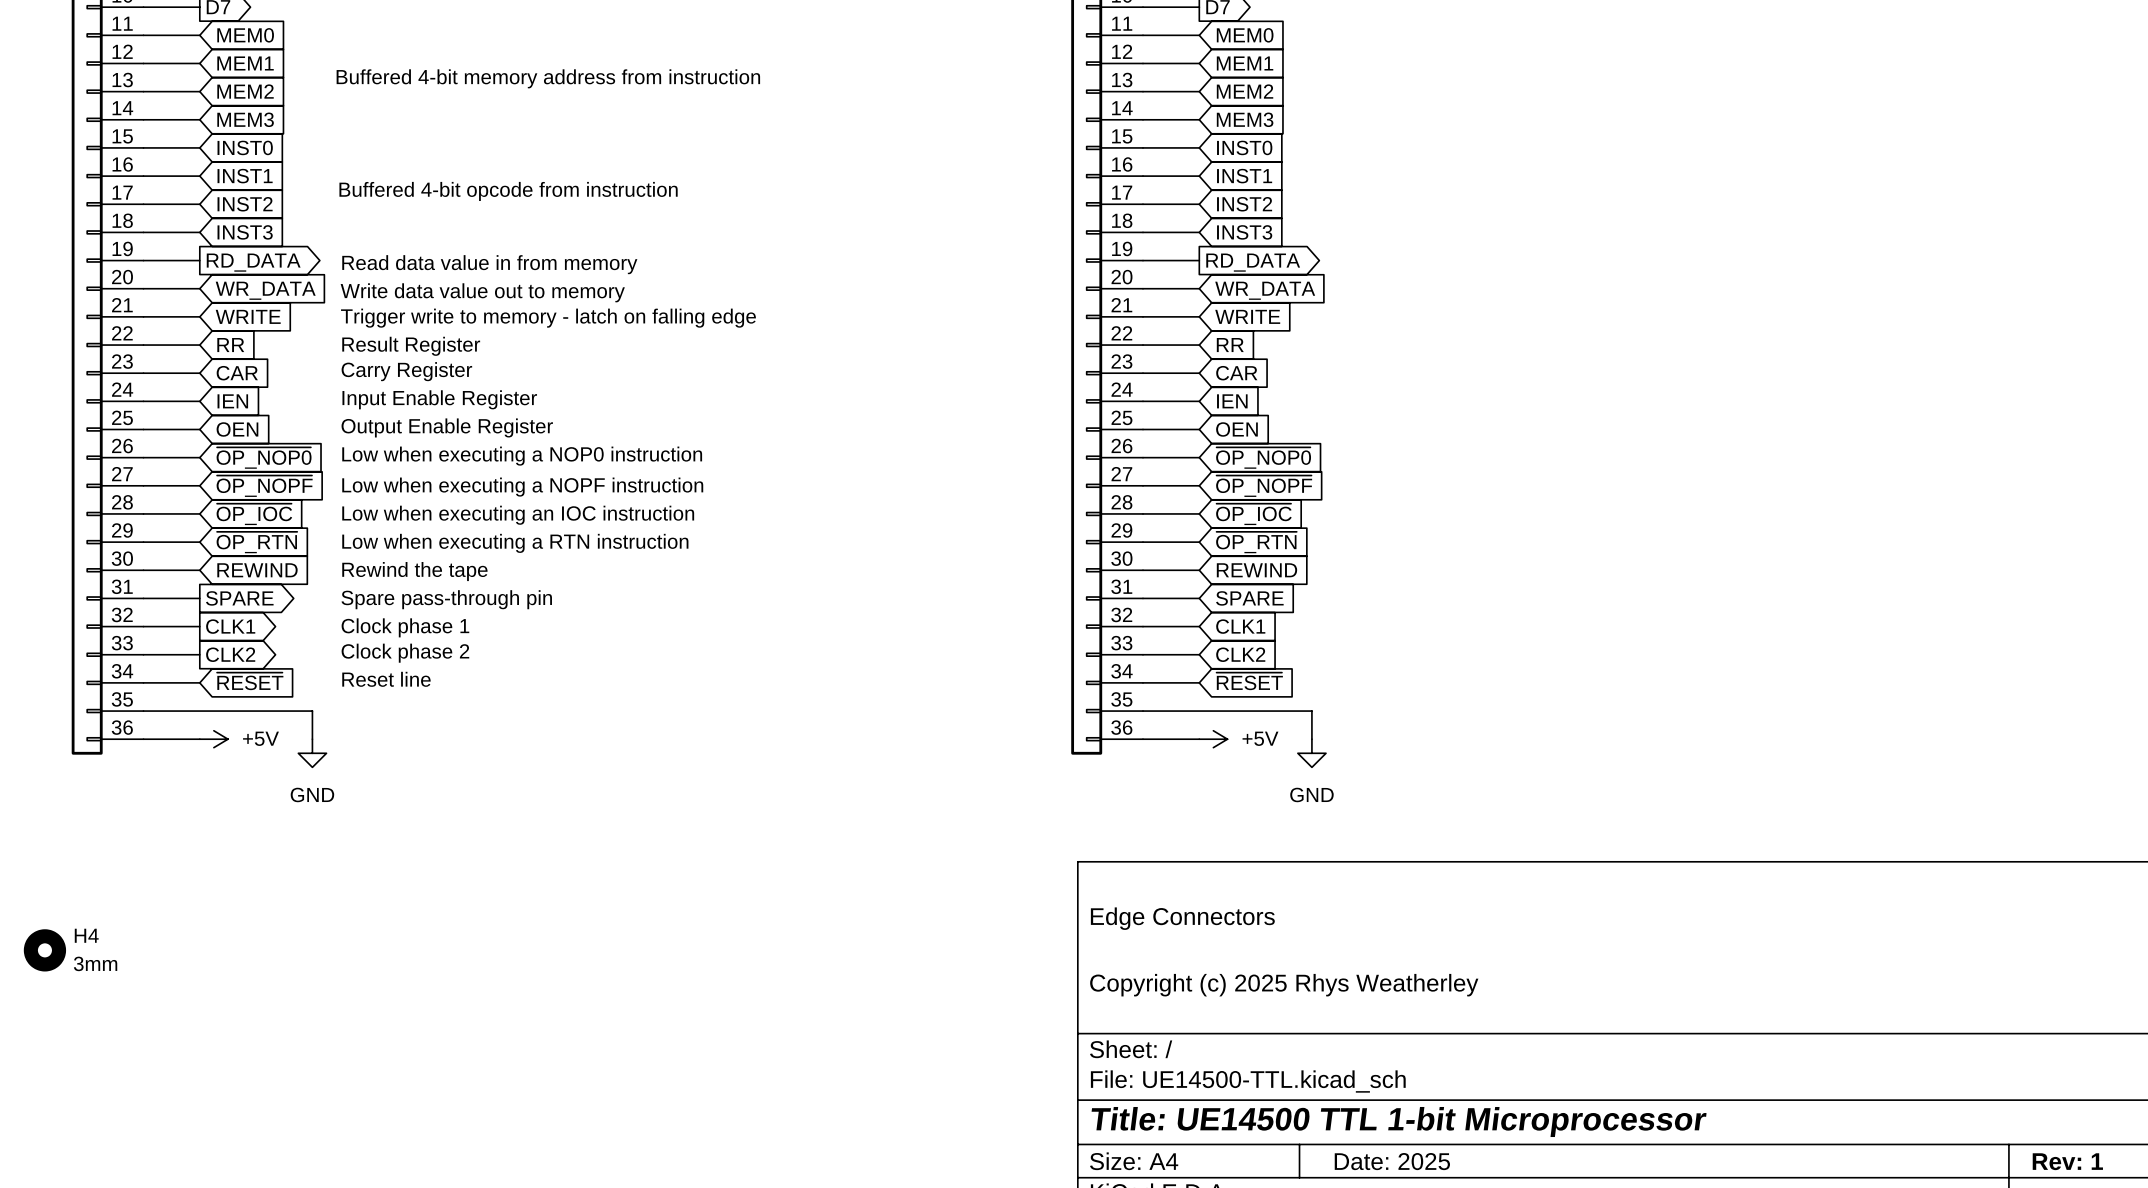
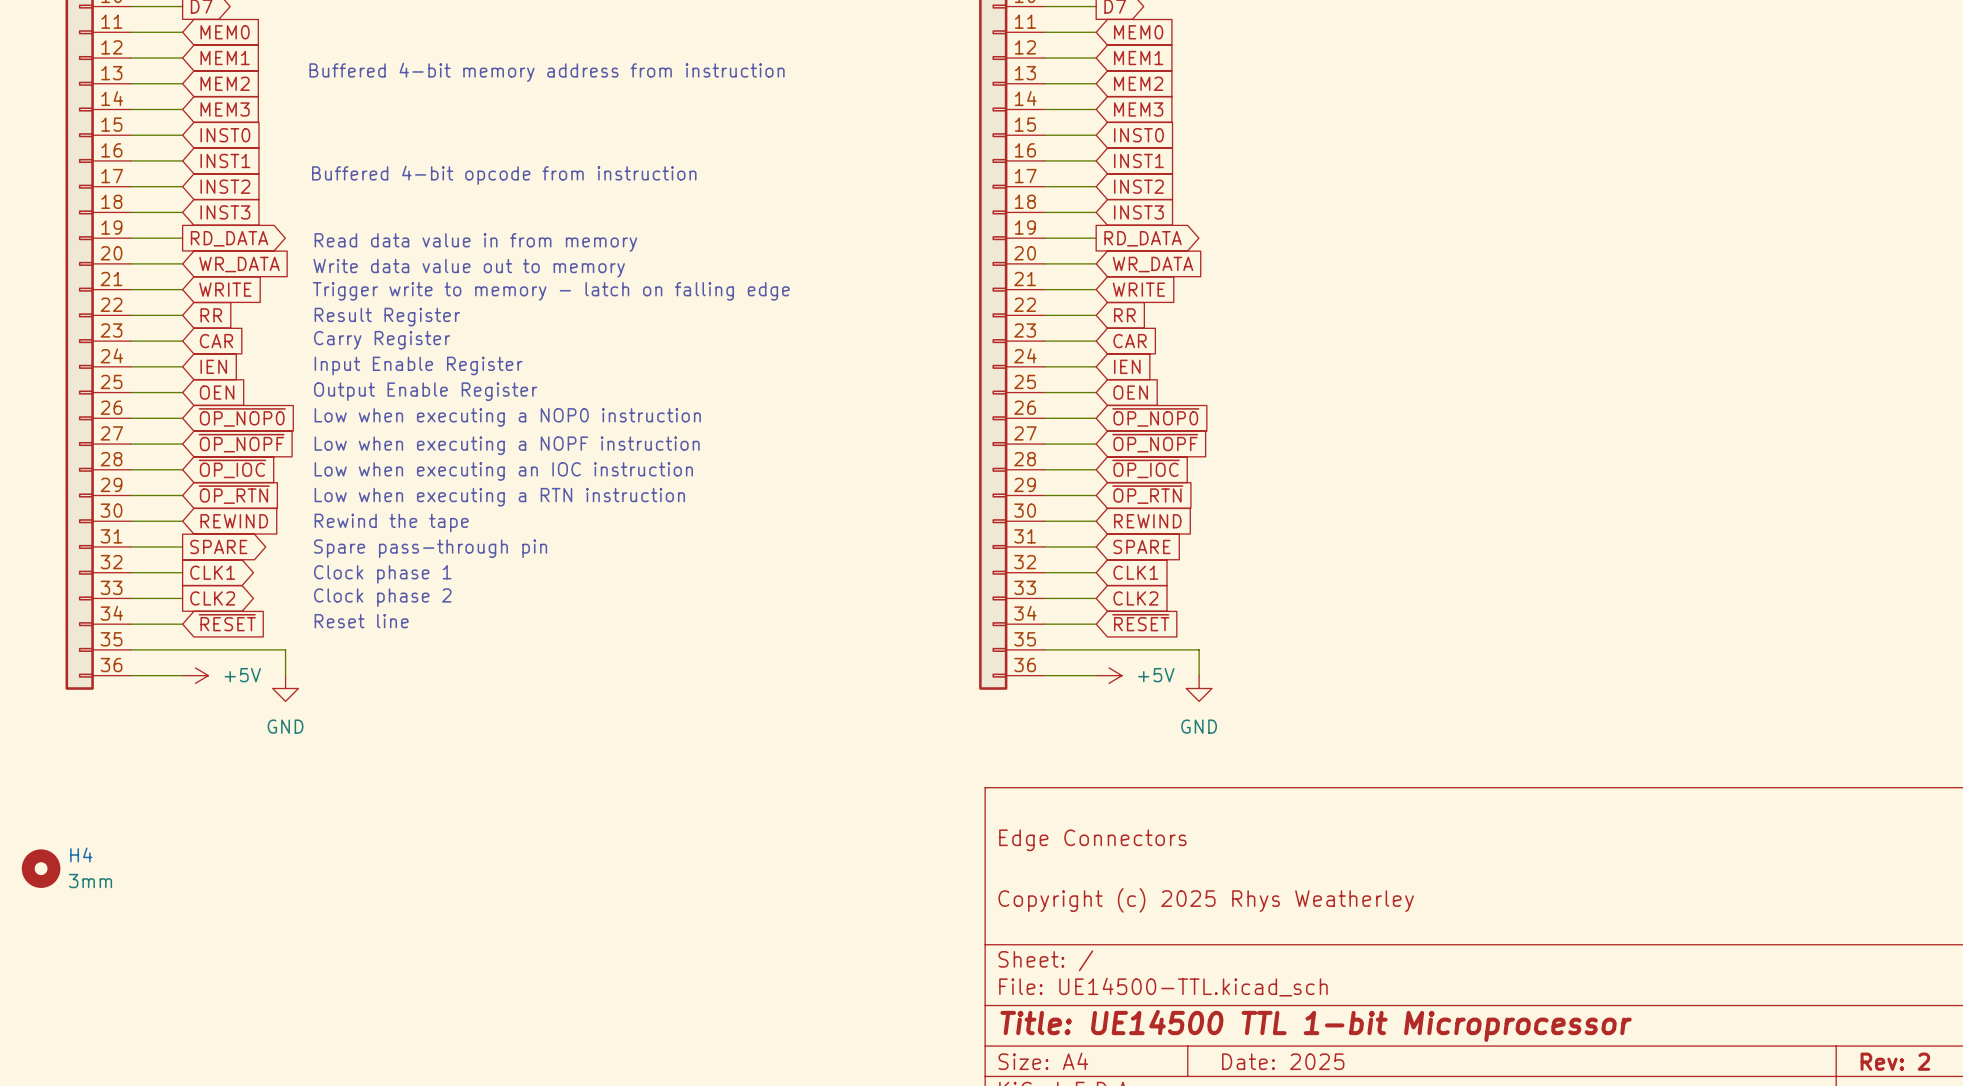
title block: Rev: 1 (2067, 1161) -> Rev: 2 (1895, 1061)

